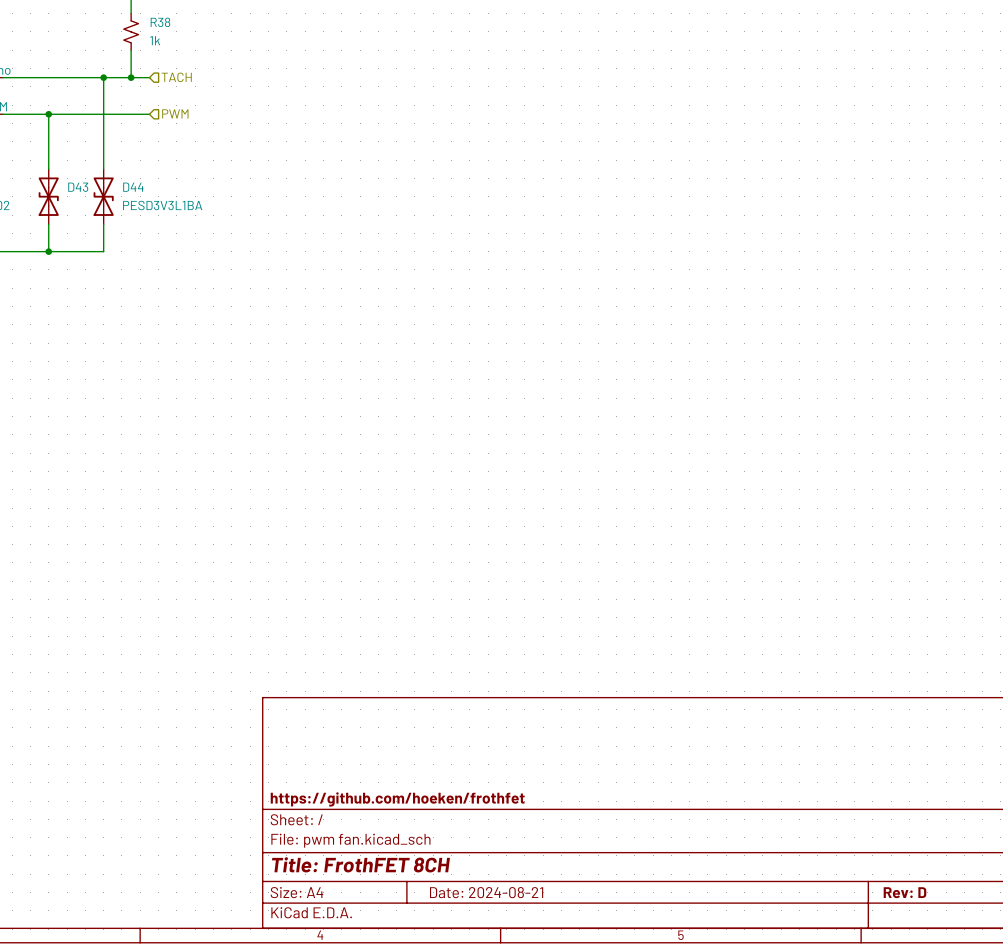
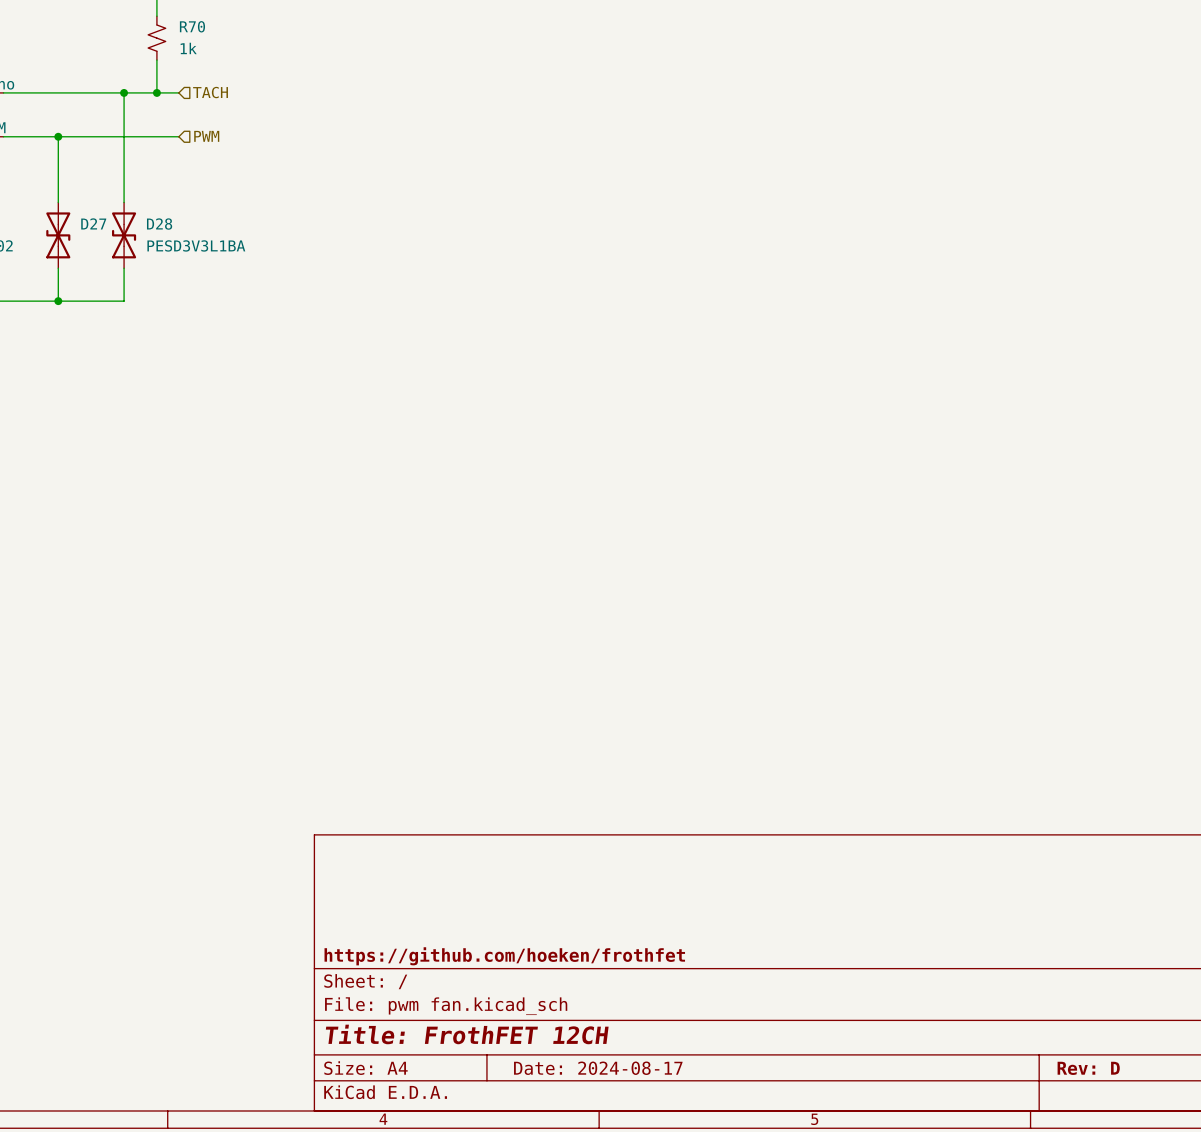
R38 name: R38 (160, 22) -> R70 (192, 26)
D43 name: D43 (78, 187) -> D27 (93, 223)
D44 name: D44 (133, 187) -> D28 (159, 224)
title block: Title: FrothFET 8CH (360, 864) -> Title: FrothFET 12CH (467, 1034)
title block: Date: 2024-08-21 (486, 892) -> Date: 2024-08-17 (598, 1068)

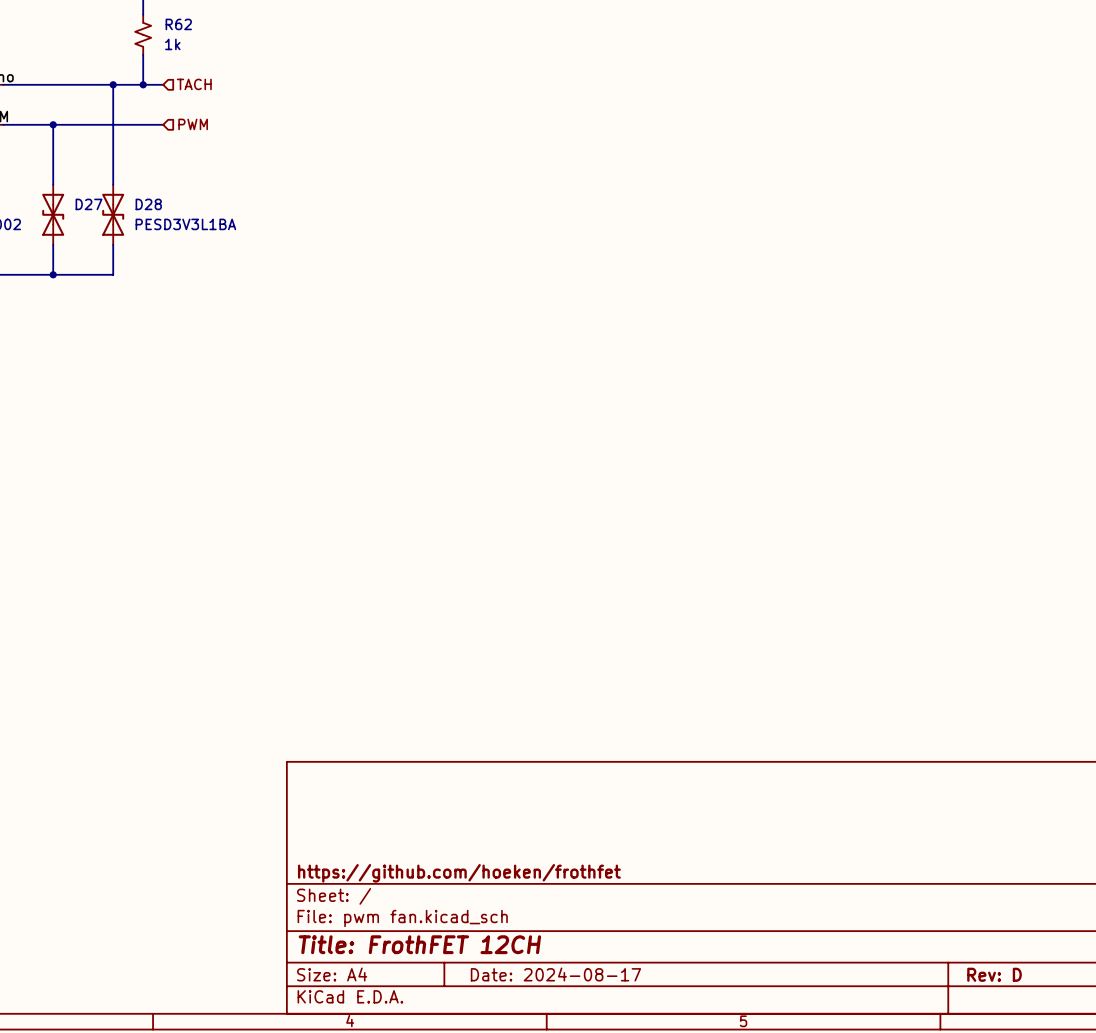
R70 name: R70 (192, 26) -> R62 (178, 24)

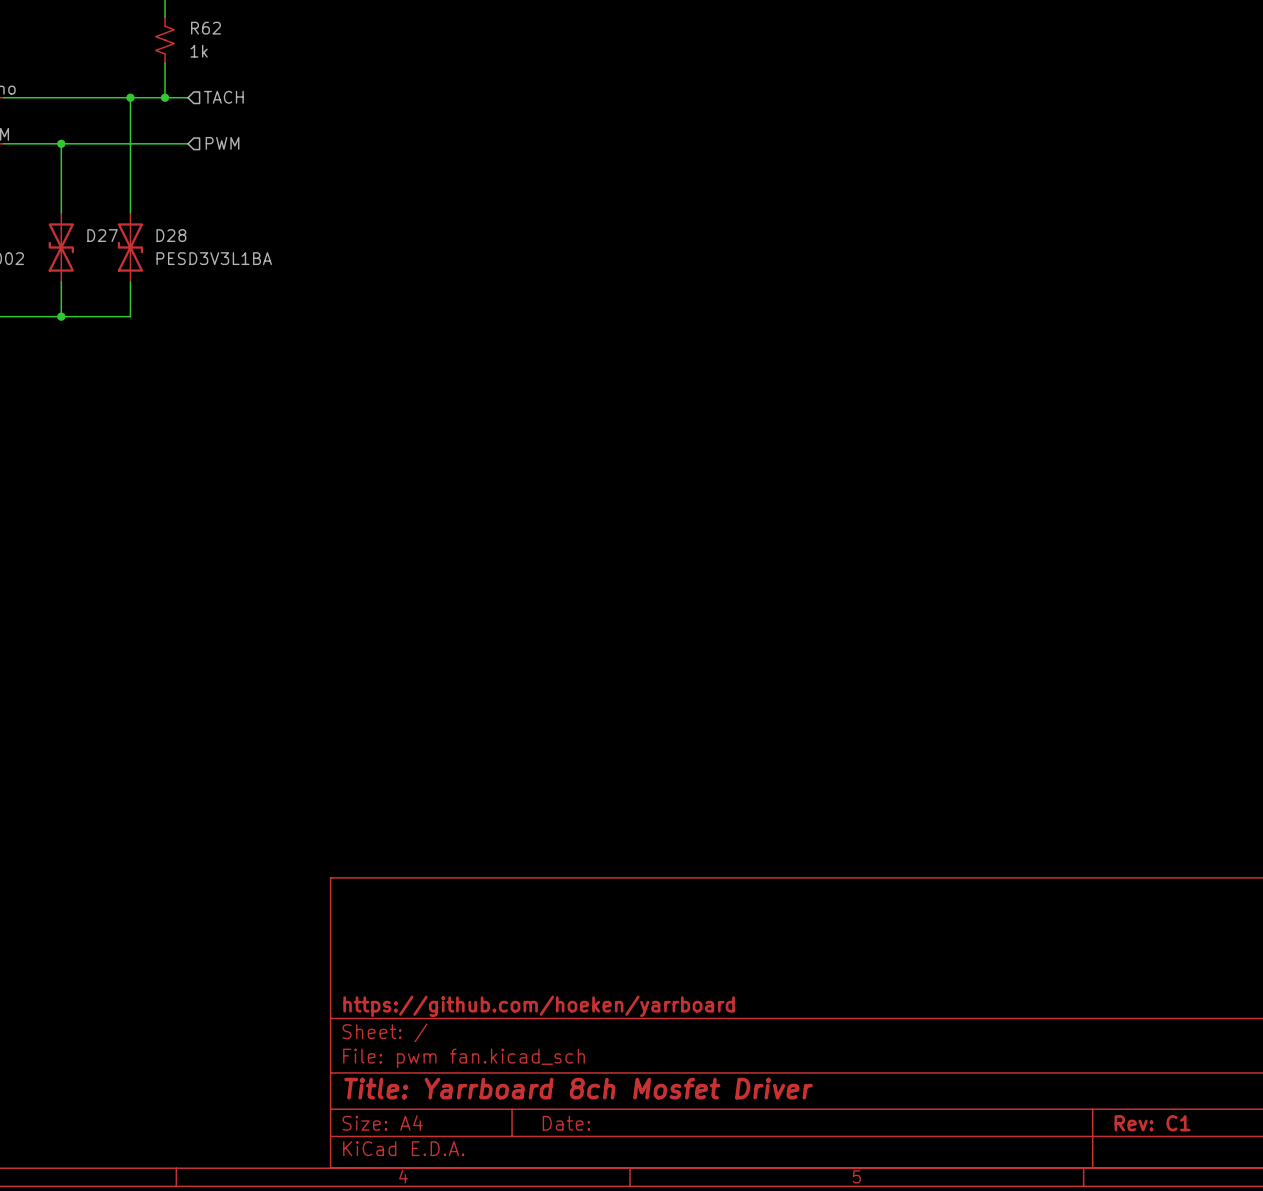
title block: https://github.com/hoeken/frothfet (459, 873) -> https://github.com/hoeken/yarrboard (539, 1006)
title block: Title: FrothFET 12CH (419, 944) -> Title: Yarrboard 8ch Mosfet Driver (578, 1088)
title block: Date: 2024-08-17 (555, 974) -> Date: (566, 1123)
title block: Rev: D (994, 974) -> Rev: C1 (1152, 1123)

